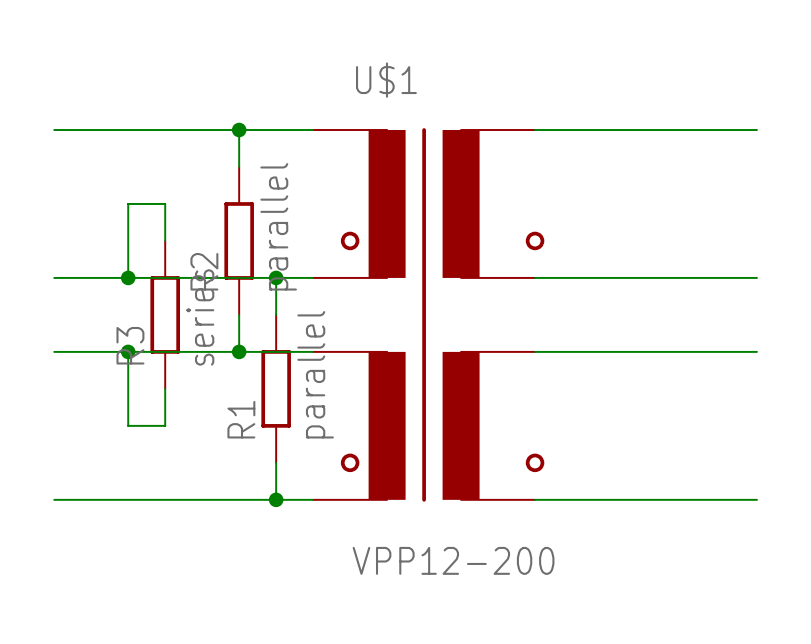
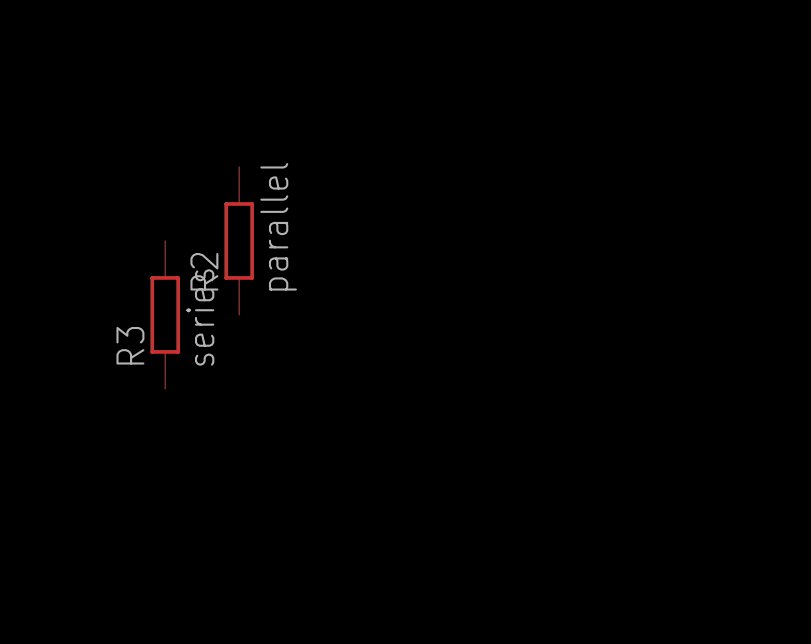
wire: (54, 130) (313, 130) -> none
wire: (239, 130) (239, 166) -> none
junction: (239, 130) -> none
wire: (535, 130) (756, 130) -> none
wire: (165, 240) (165, 203) (128, 203) (128, 277) -> none
wire: (54, 277) (313, 277) -> none
junction: (128, 277) -> none
wire: (276, 277) (276, 314) -> none
junction: (276, 277) -> none
wire: (535, 277) (756, 277) -> none
wire: (239, 314) (239, 351) -> none
U$1: VPP12-200 (428, 314) -> none
wire: (54, 351) (313, 351) -> none
wire: (128, 351) (128, 425) (165, 425) (165, 388) -> none
junction: (128, 351) -> none
junction: (239, 351) -> none
wire: (535, 351) (756, 351) -> none
R1: parallel (276, 388) -> none
wire: (276, 462) (276, 499) -> none
wire: (54, 499) (313, 499) -> none
junction: (276, 499) -> none
wire: (535, 499) (756, 499) -> none

